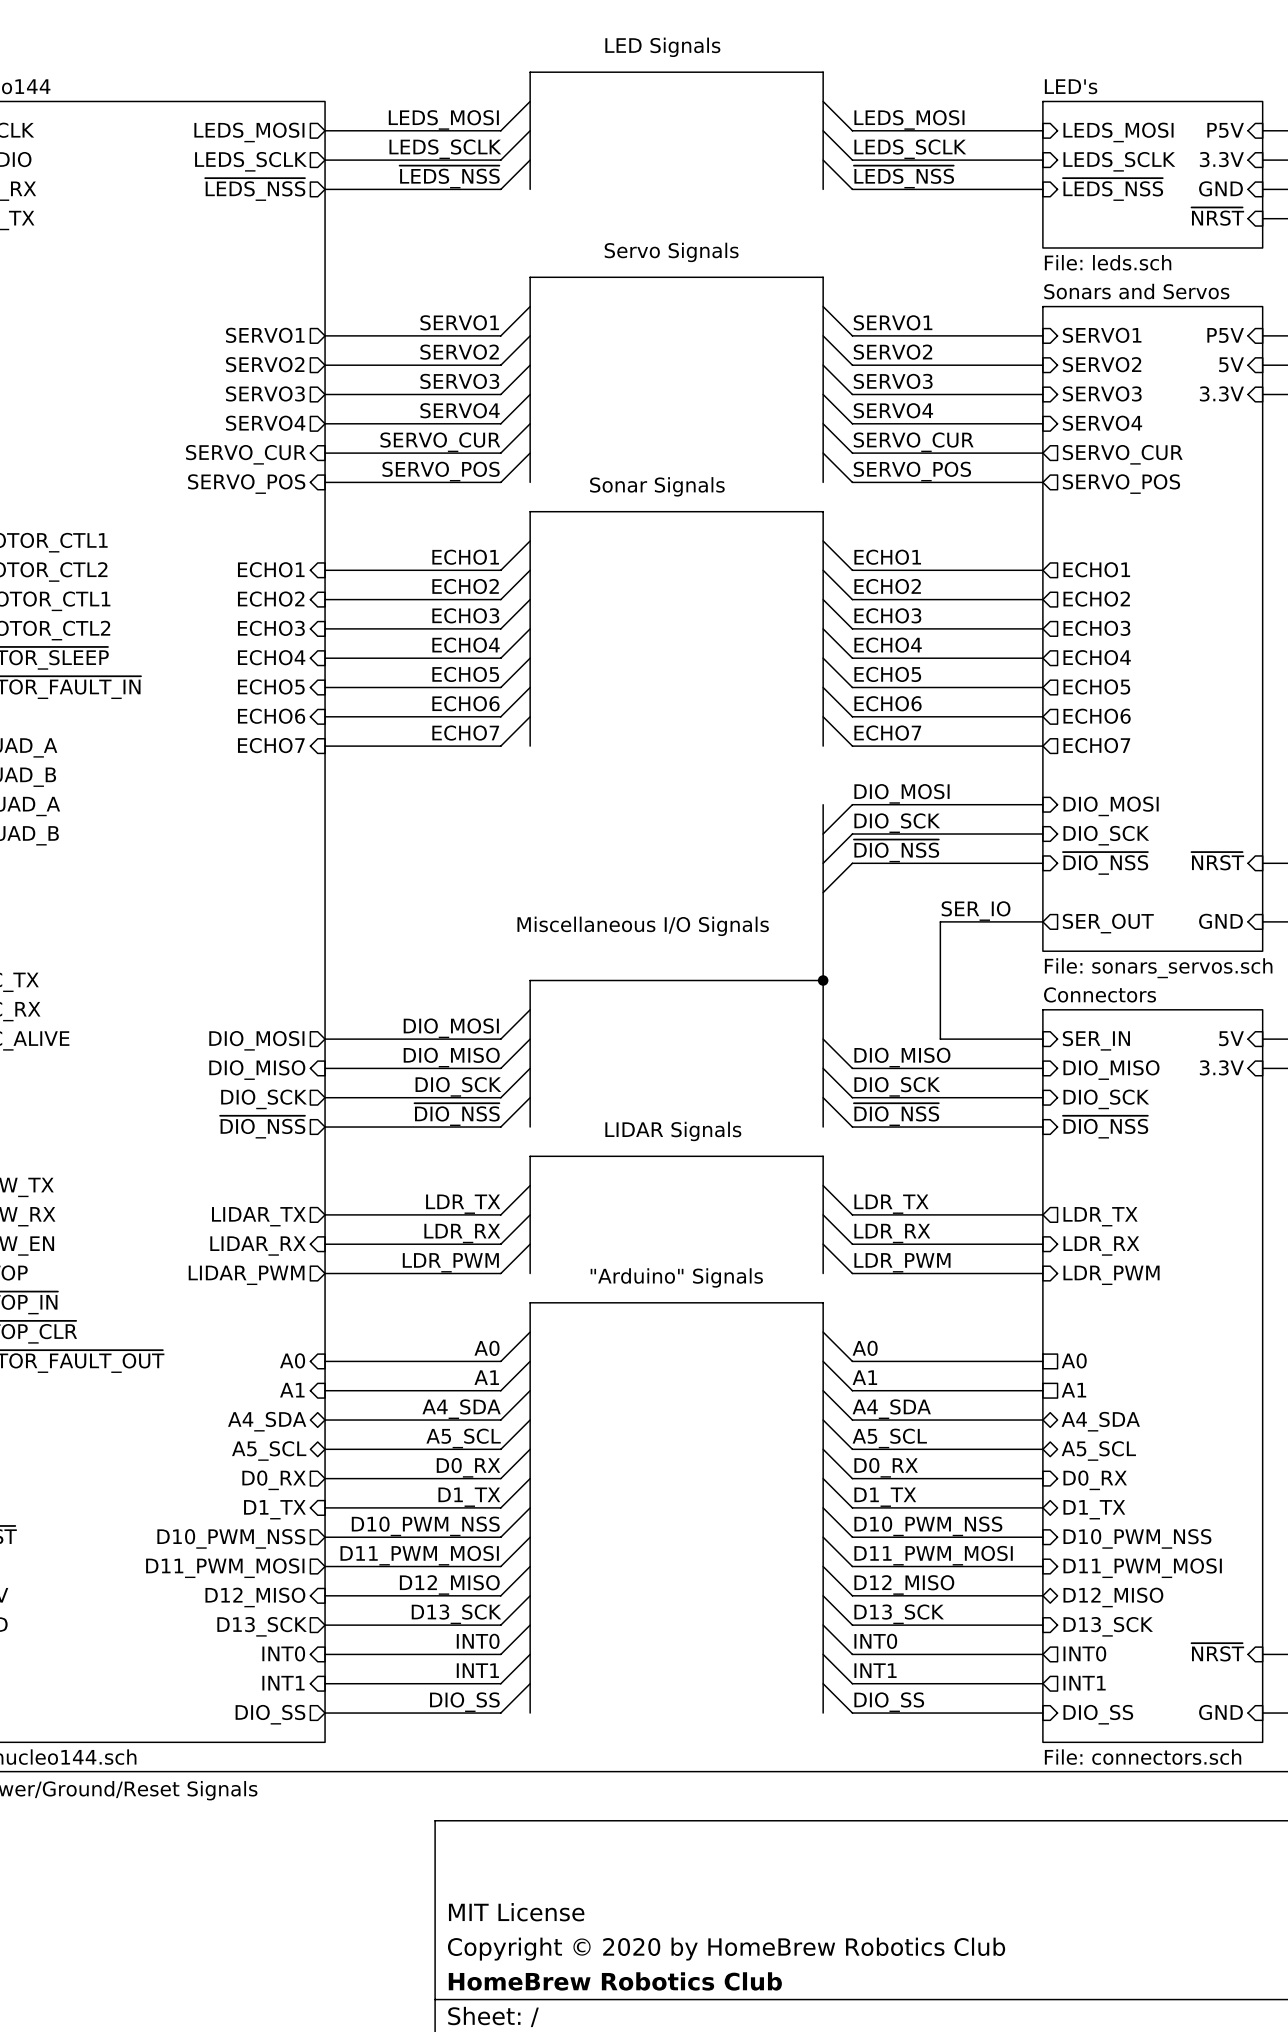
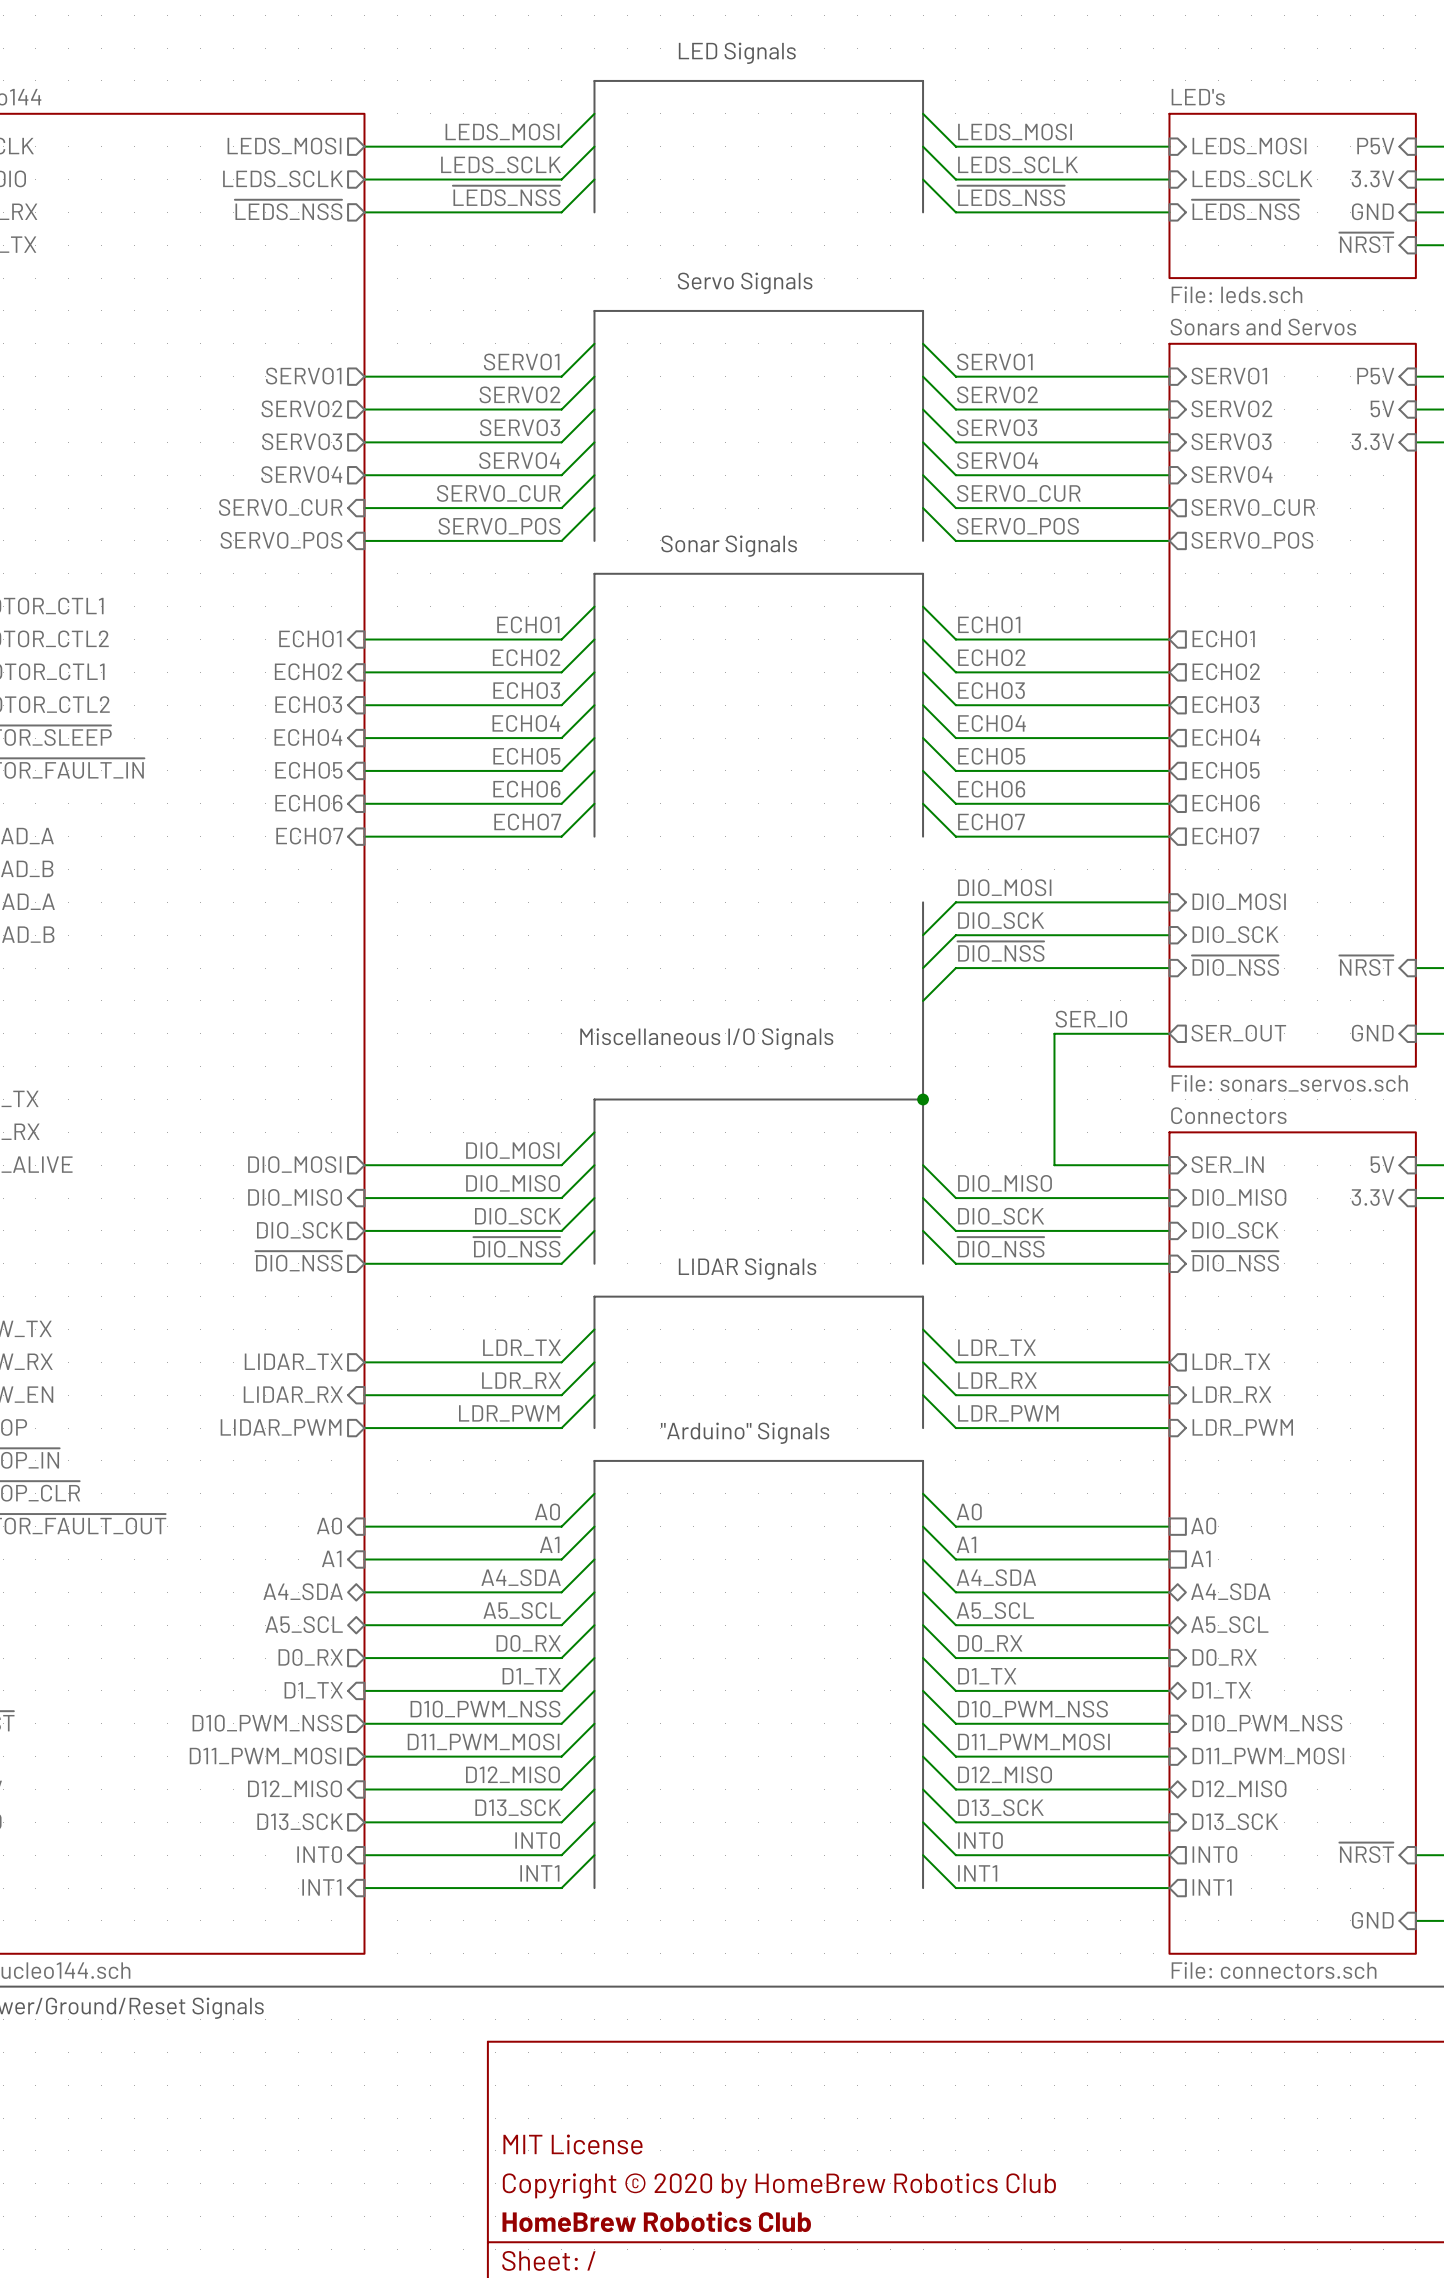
wire: (530, 1683) (500, 1713) (325, 1713) -> none
bus: (530, 1683) (530, 1713) -> none
wire: (823, 1683) (852, 1713) (1042, 1713) -> none
bus: (823, 1683) (823, 1713) -> none
label: DIO_SS (464, 1702) -> none
label: DIO_SS (889, 1702) -> none
sheet pin: DIO_SS (270, 1714) -> none
sheet pin: DIO_SS (1098, 1714) -> none

